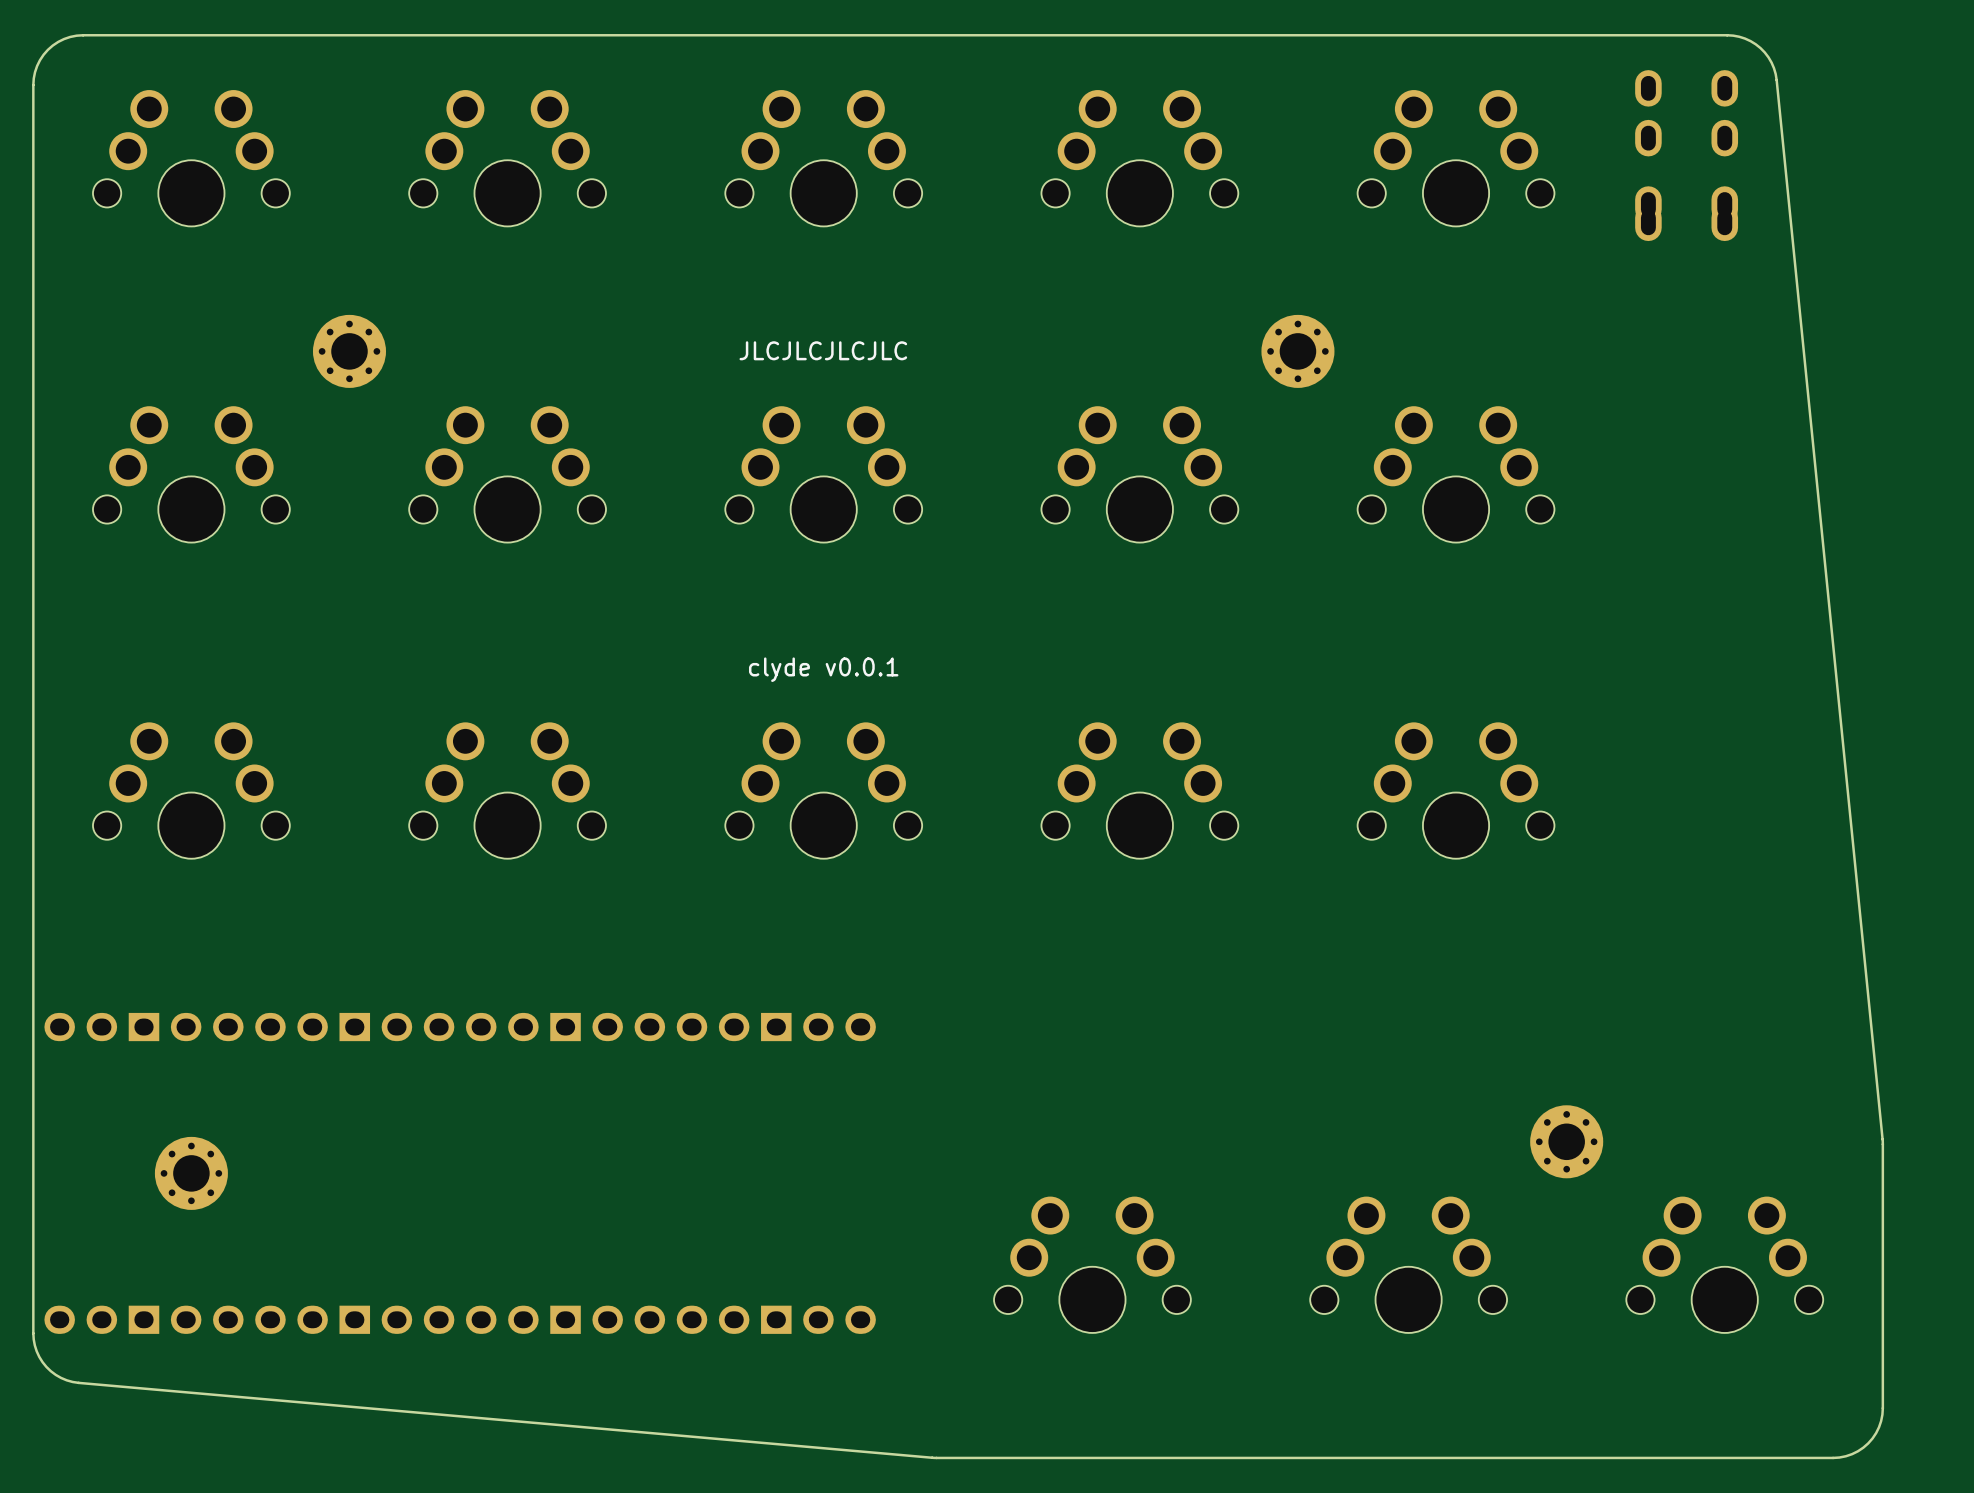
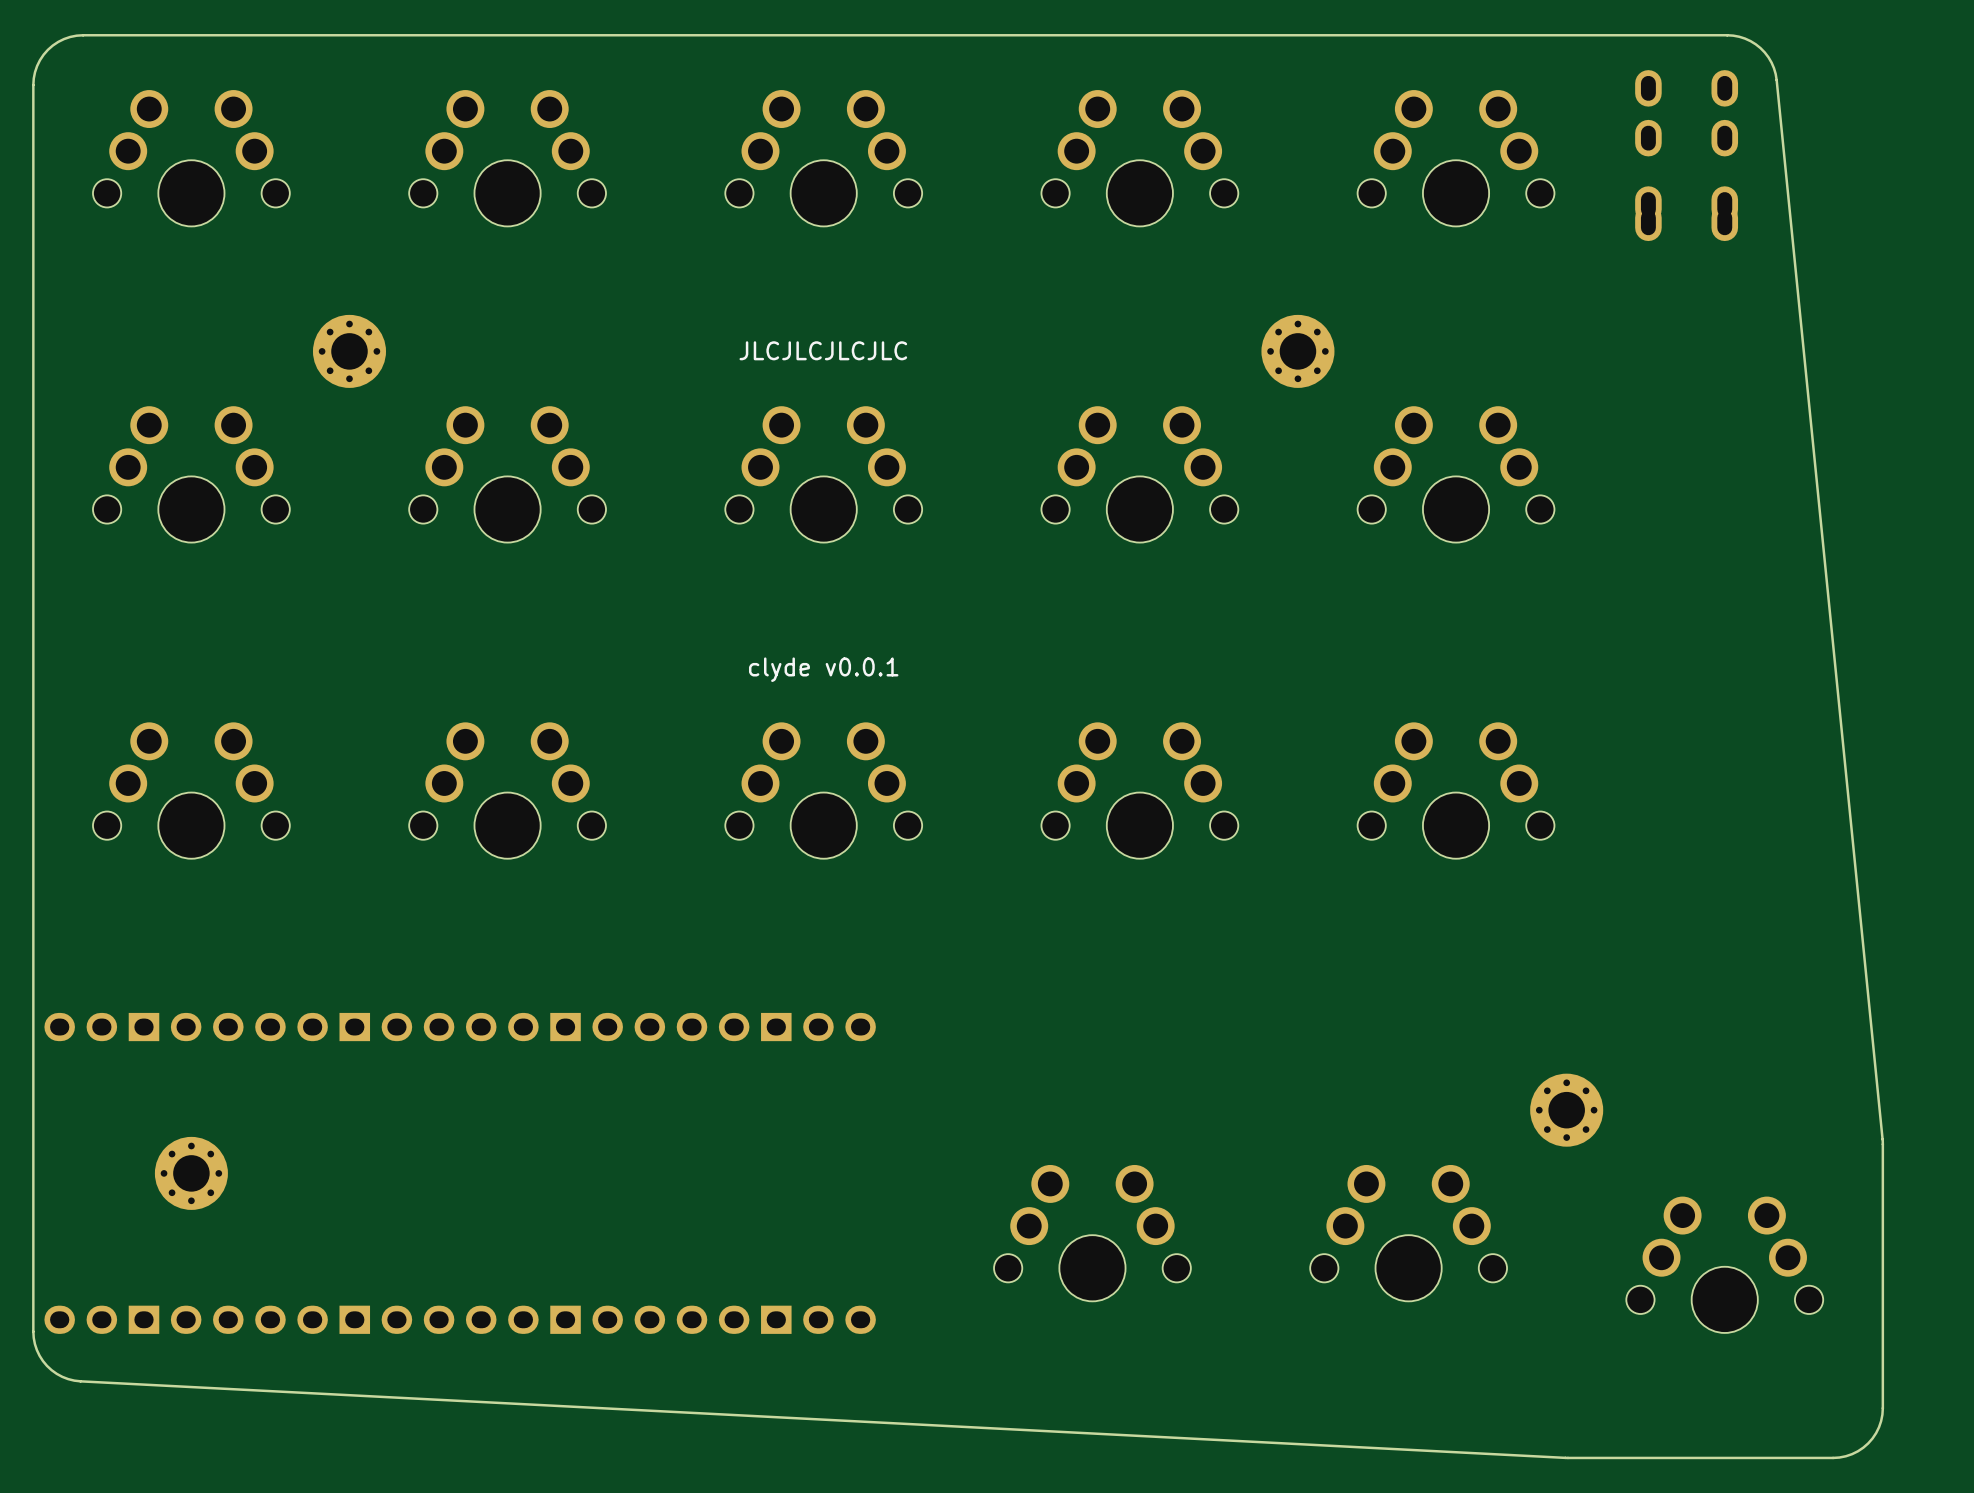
part position: (1566, 1141) -> (1566, 1110)
part position: (1092, 1264) -> (1092, 1233)
part position: (1408, 1264) -> (1408, 1233)
board edge: (33, 1331) (36, 1351) (46, 1366) (61, 1377) (78, 1382) (932, 1457) (1567, 1457) -> (33, 1331) (36, 1350) (47, 1365) (62, 1376) (80, 1381) (1567, 1457)

